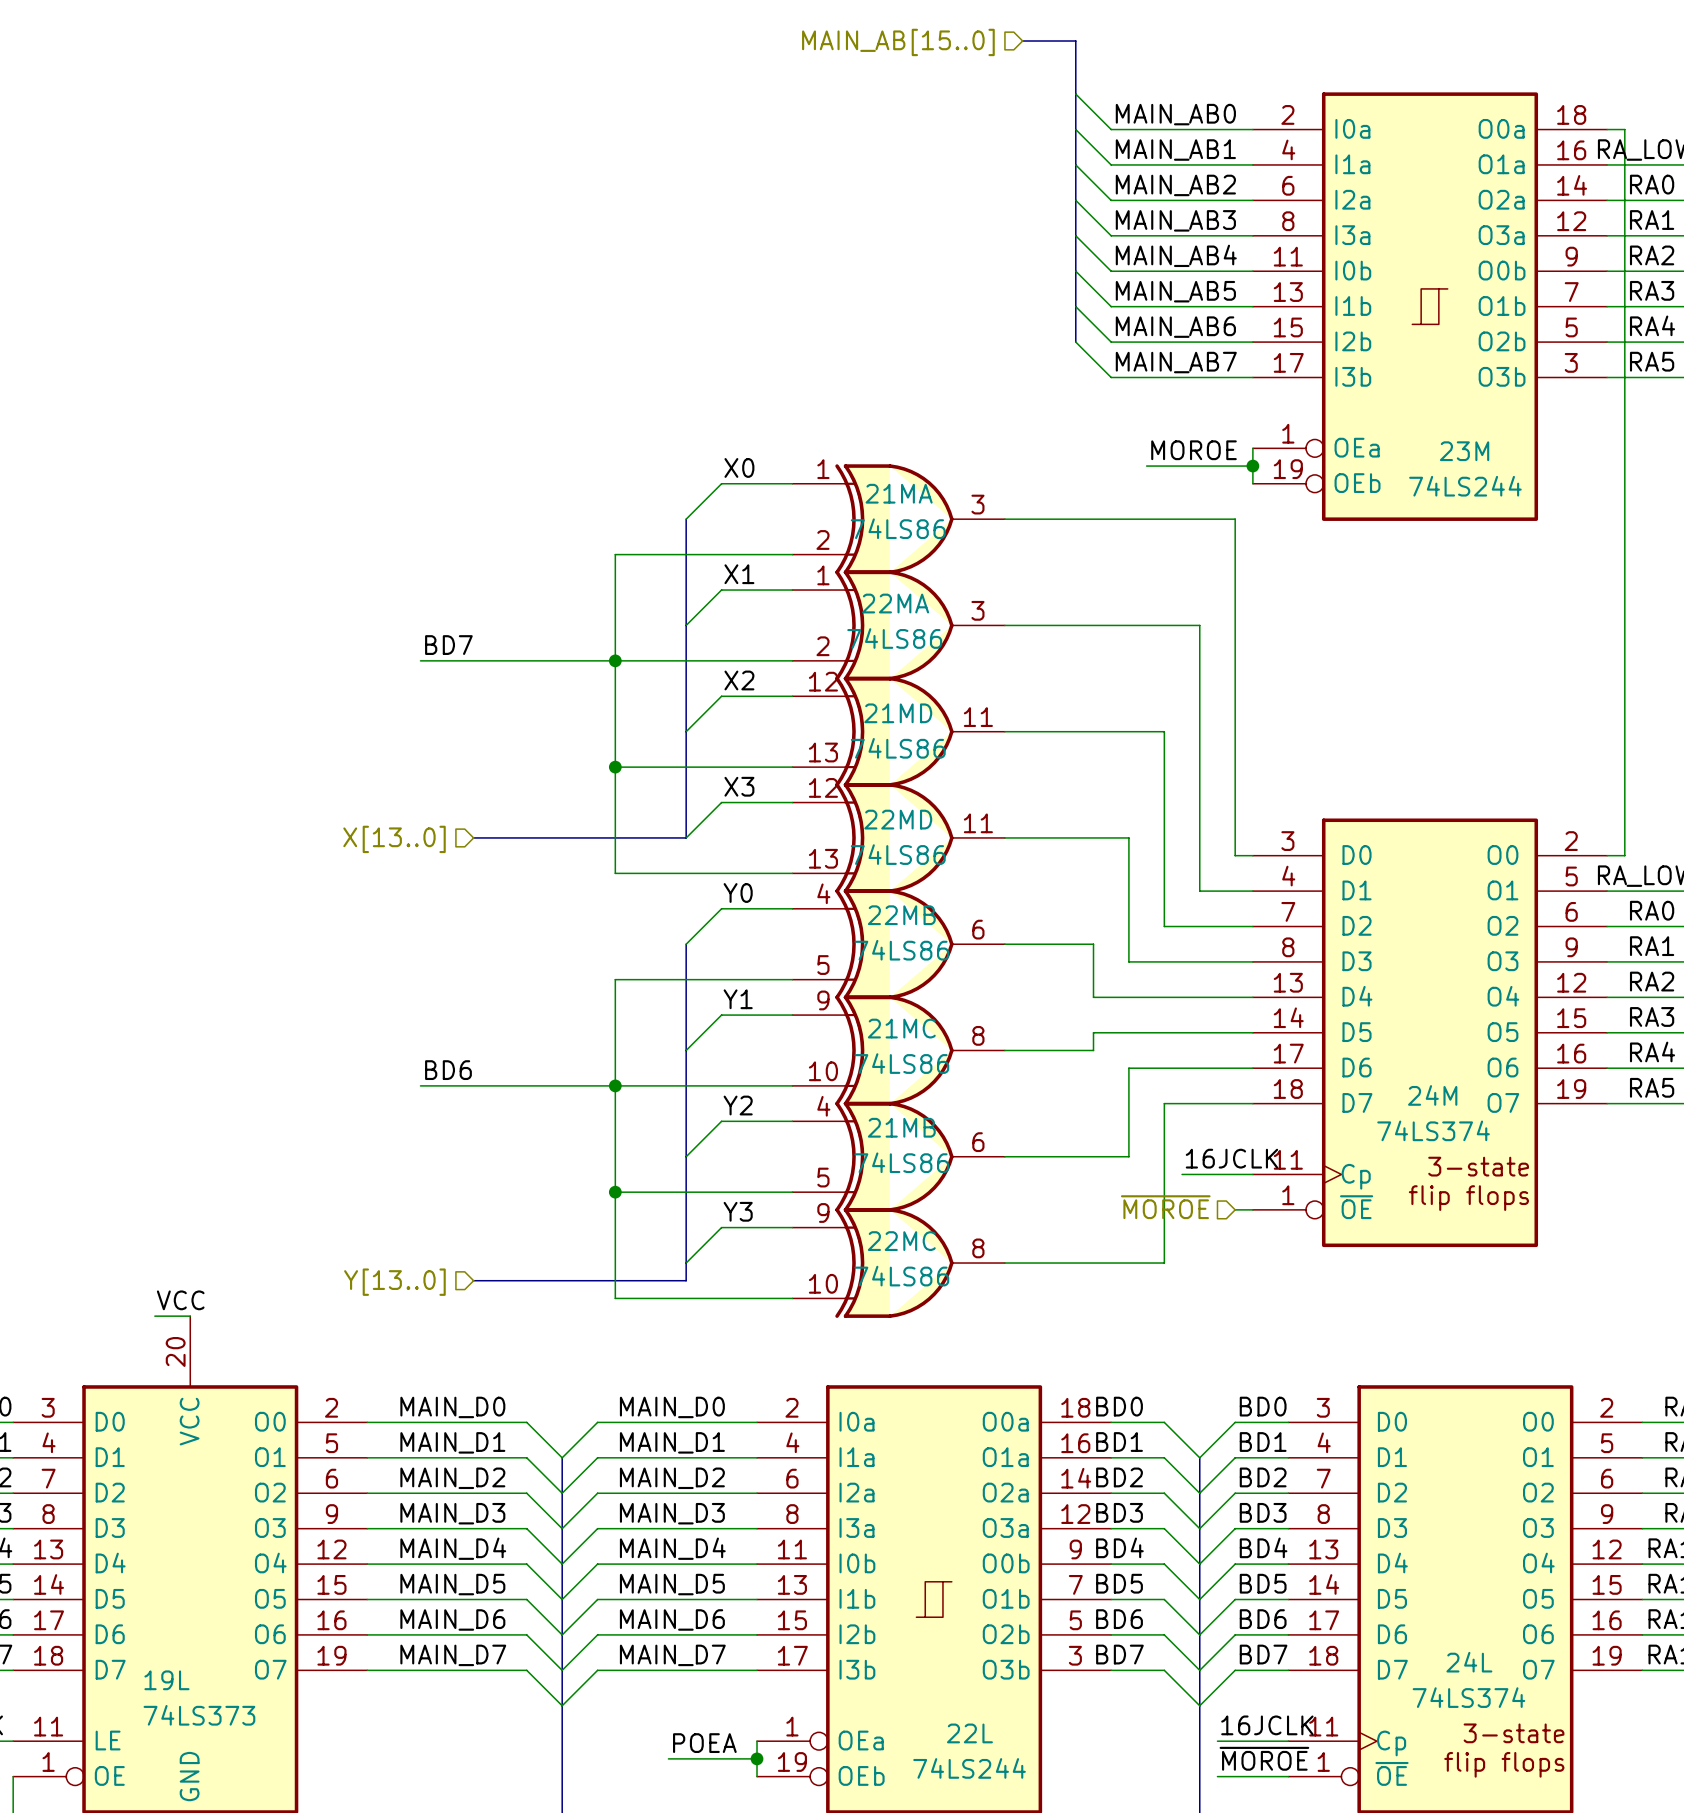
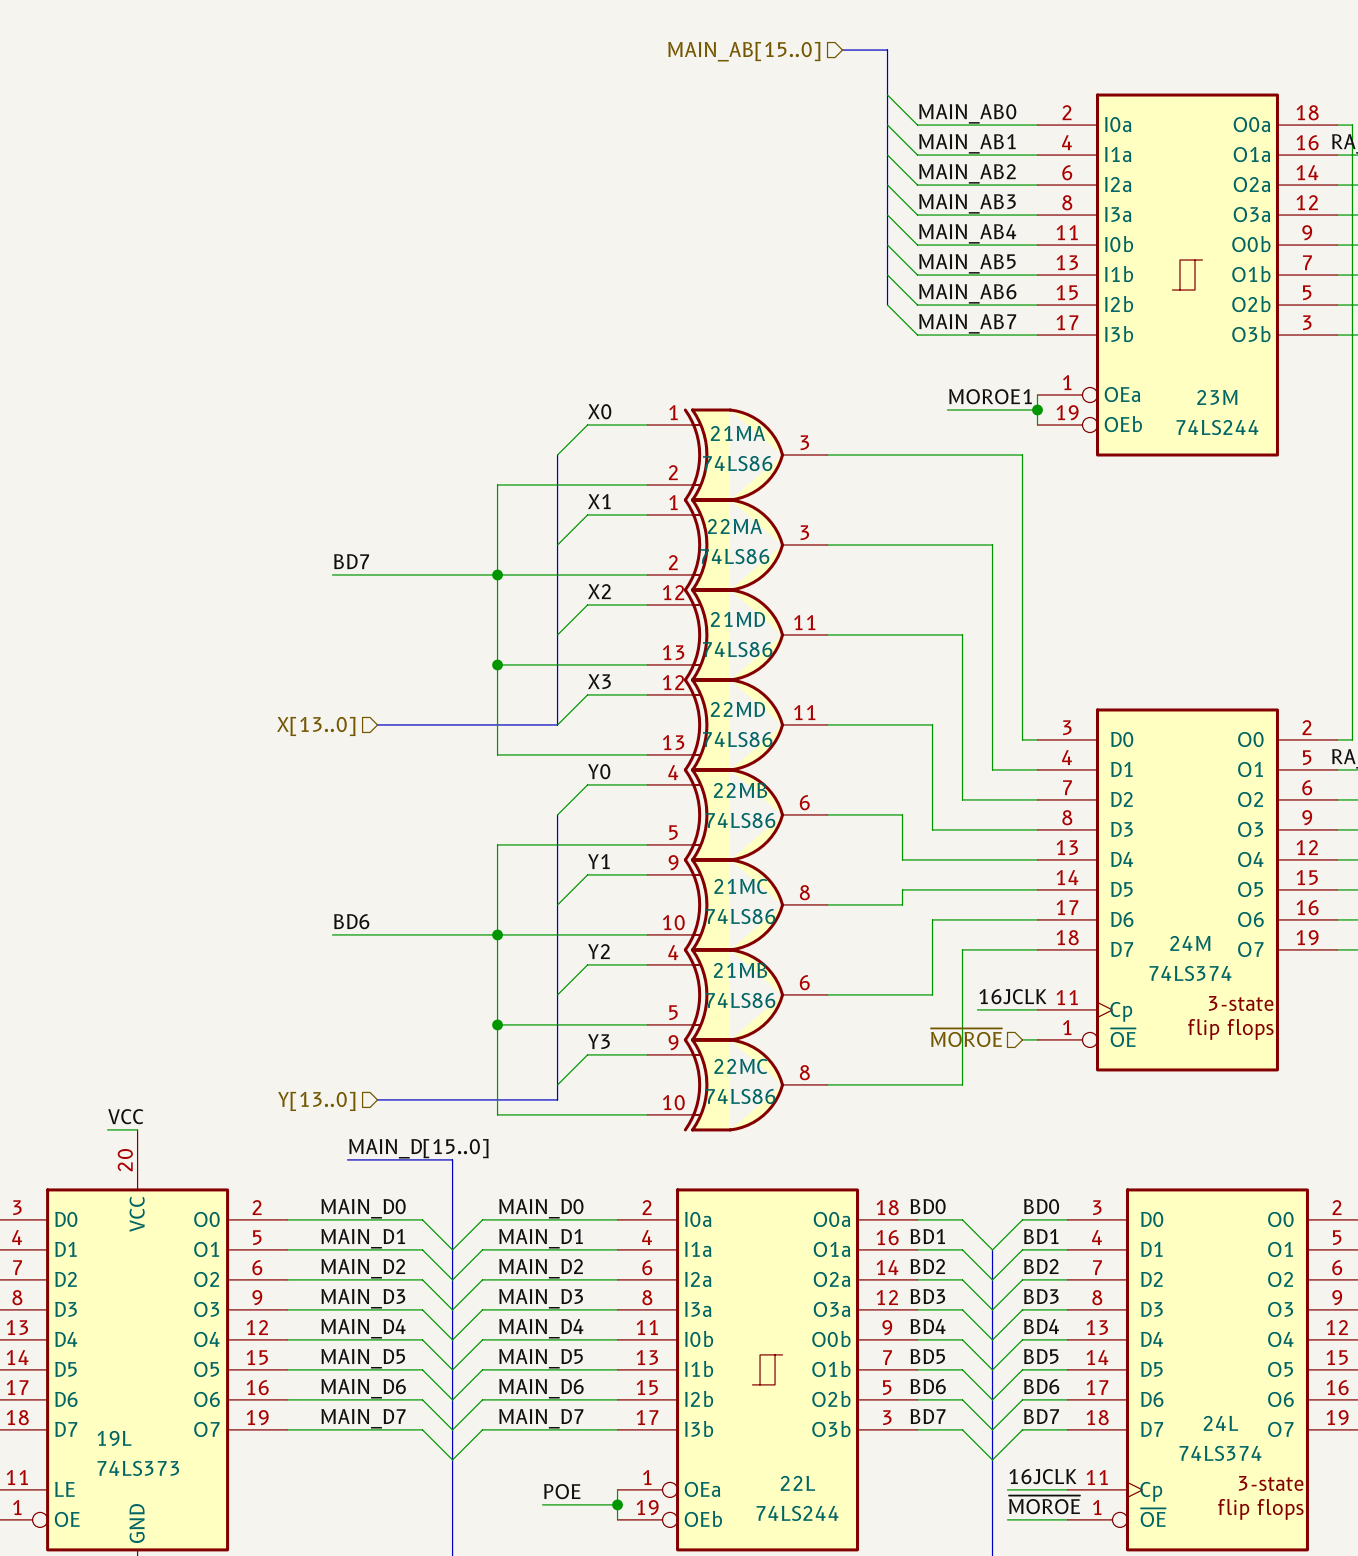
label: MOROE (1193, 450) -> MOROE1 (990, 396)
label: none -> MAIN_D[15..0] (418, 1148)
bus: none -> (347, 1159) (452, 1159) (452, 1249)
label: POEA (704, 1743) -> POE (562, 1491)

